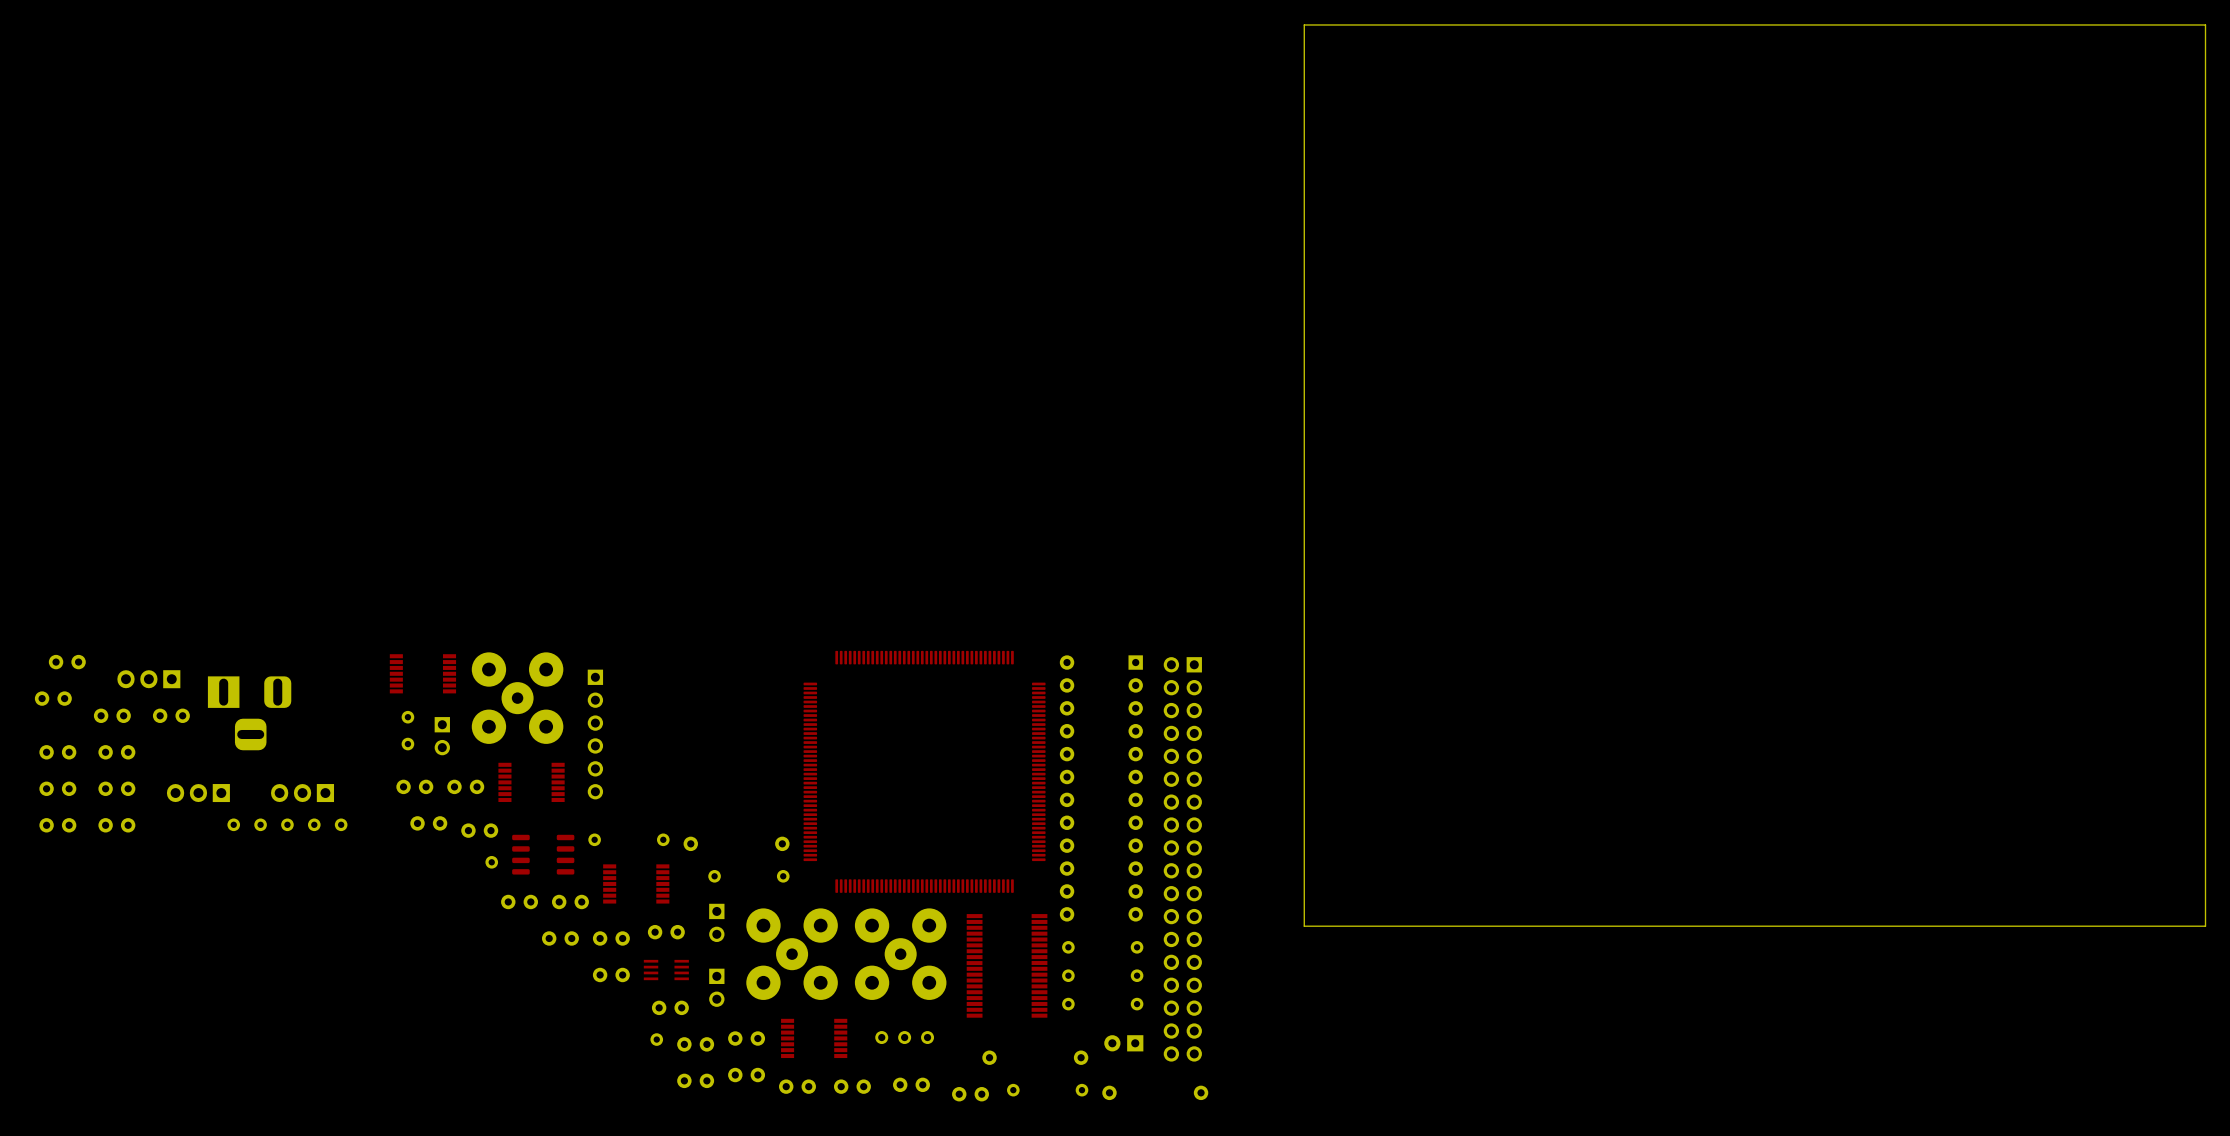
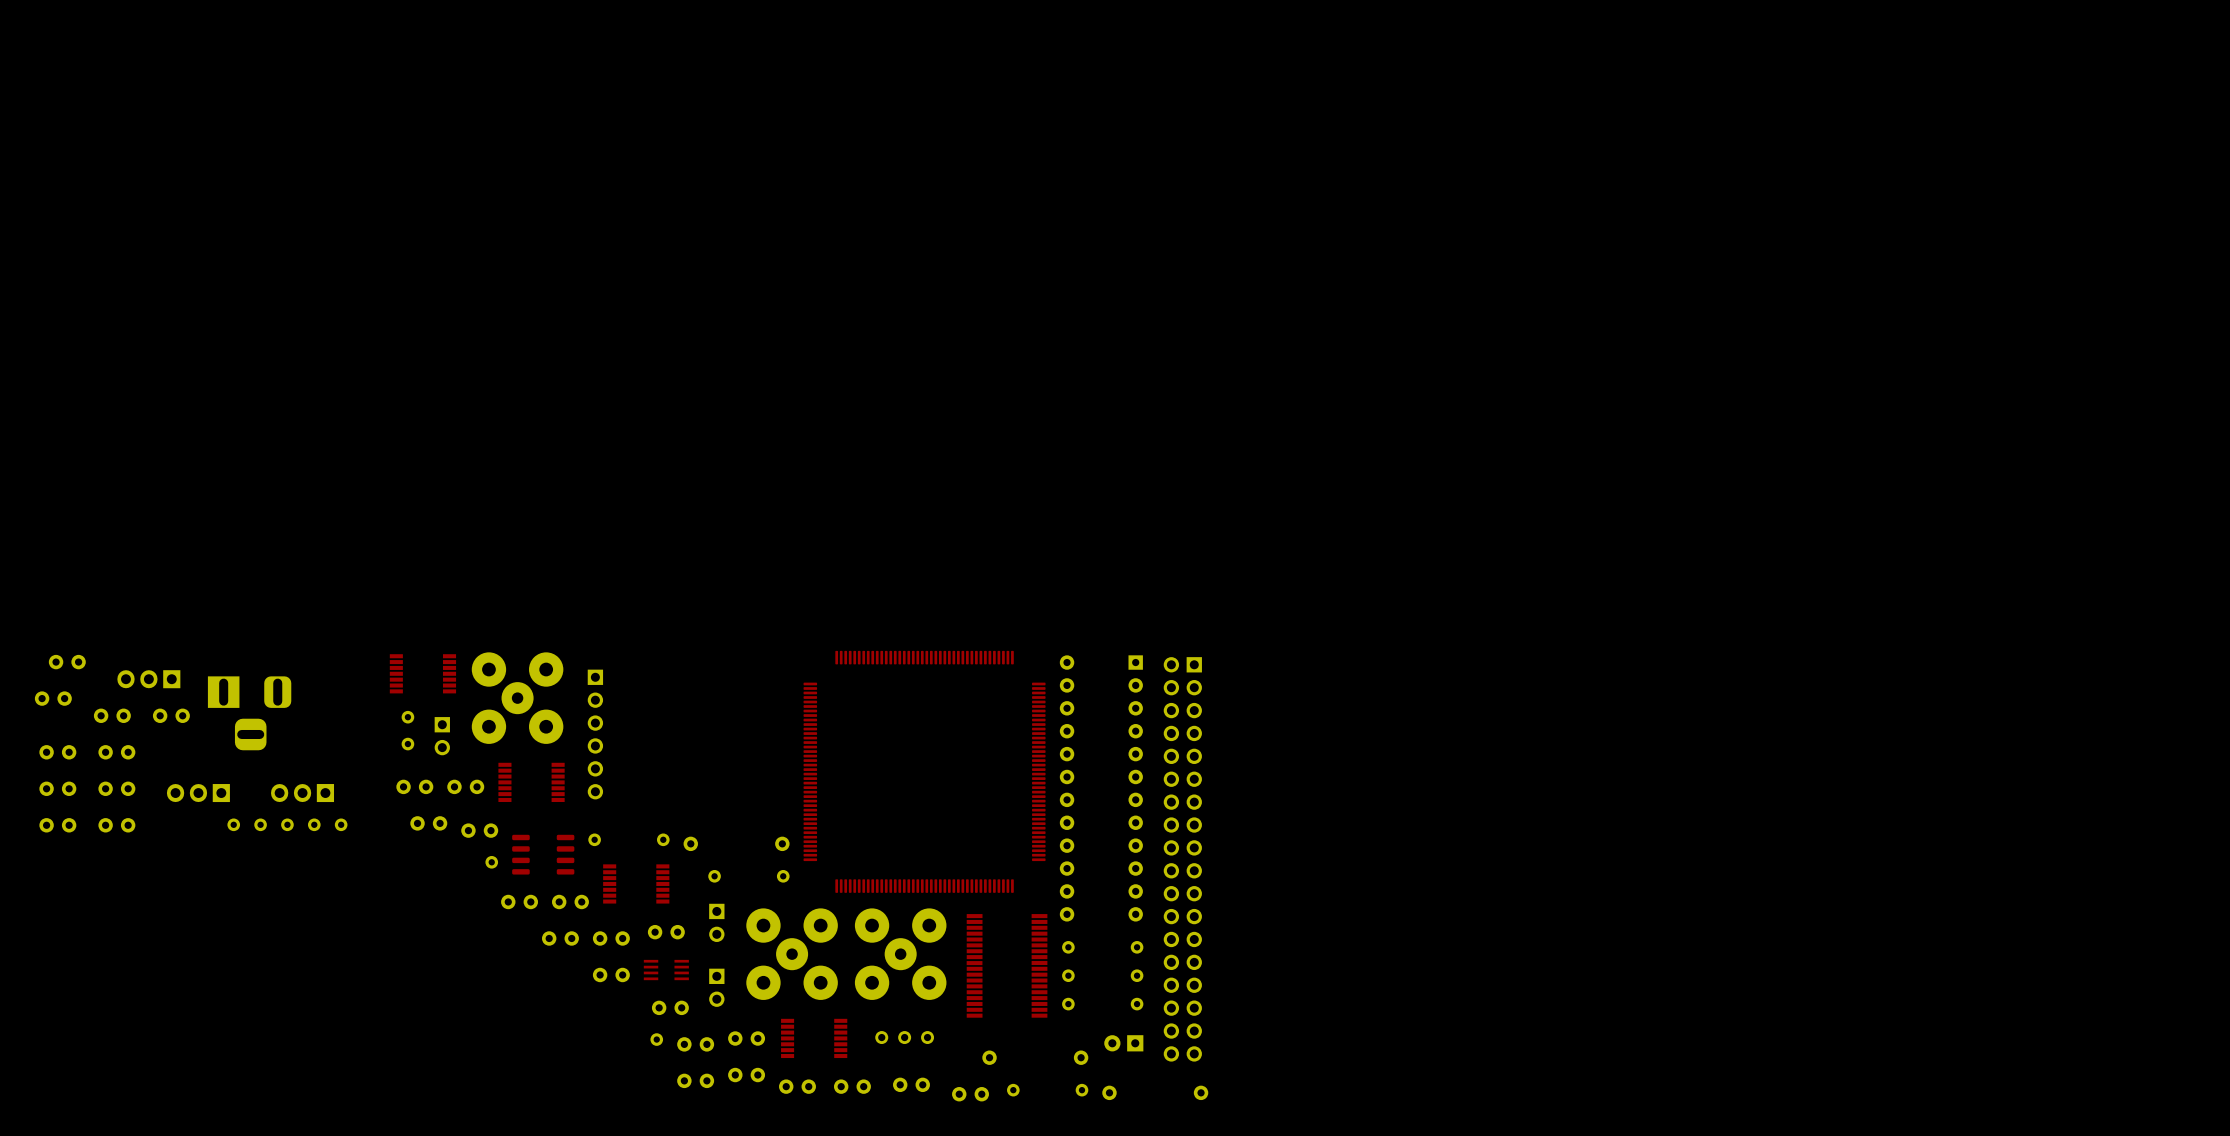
board edge: (2205, 24) (2205, 926) (1304, 926) (1304, 24) (2205, 24) -> none

